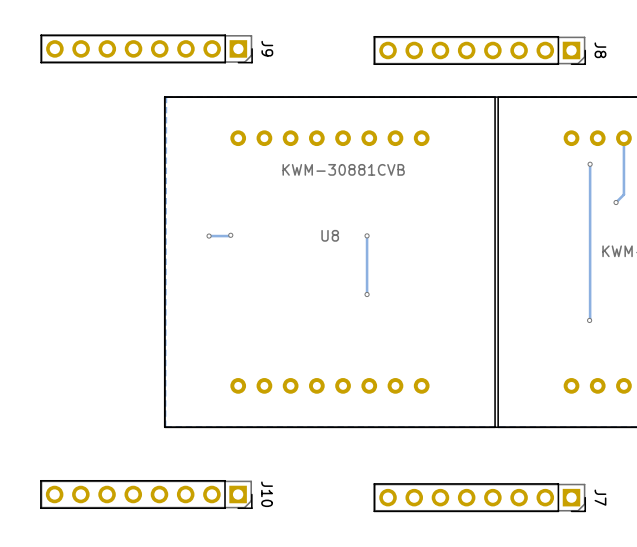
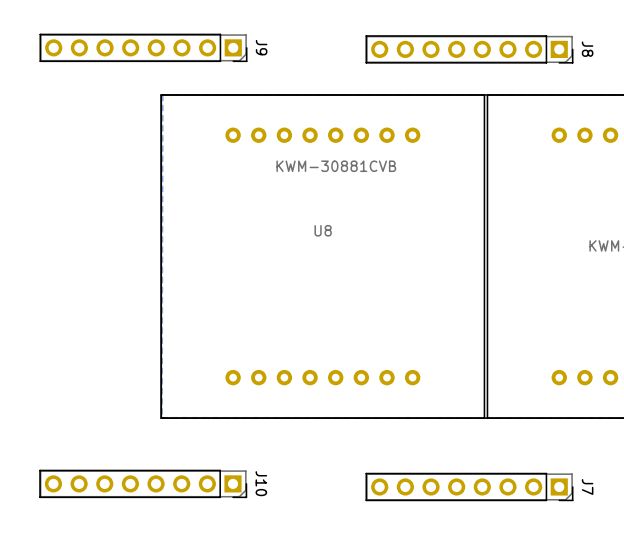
track: (623, 138) (623, 194) (616, 202) -> none
track: (590, 164) (589, 320) -> none
via: (590, 164) -> none
via: (616, 202) -> none
track: (230, 235) (209, 236) -> none
via: (230, 235) -> none
track: (367, 235) (367, 294) -> none
via: (367, 235) -> none
via: (209, 236) -> none
via: (367, 294) -> none
via: (589, 320) -> none

